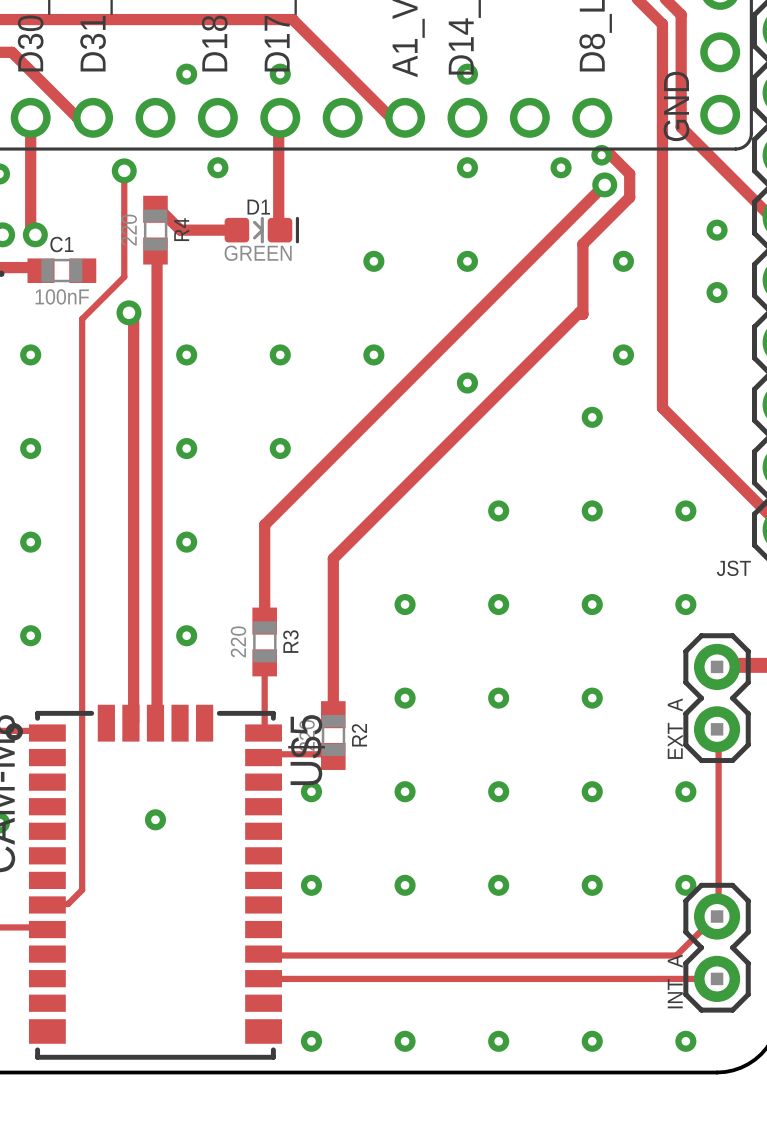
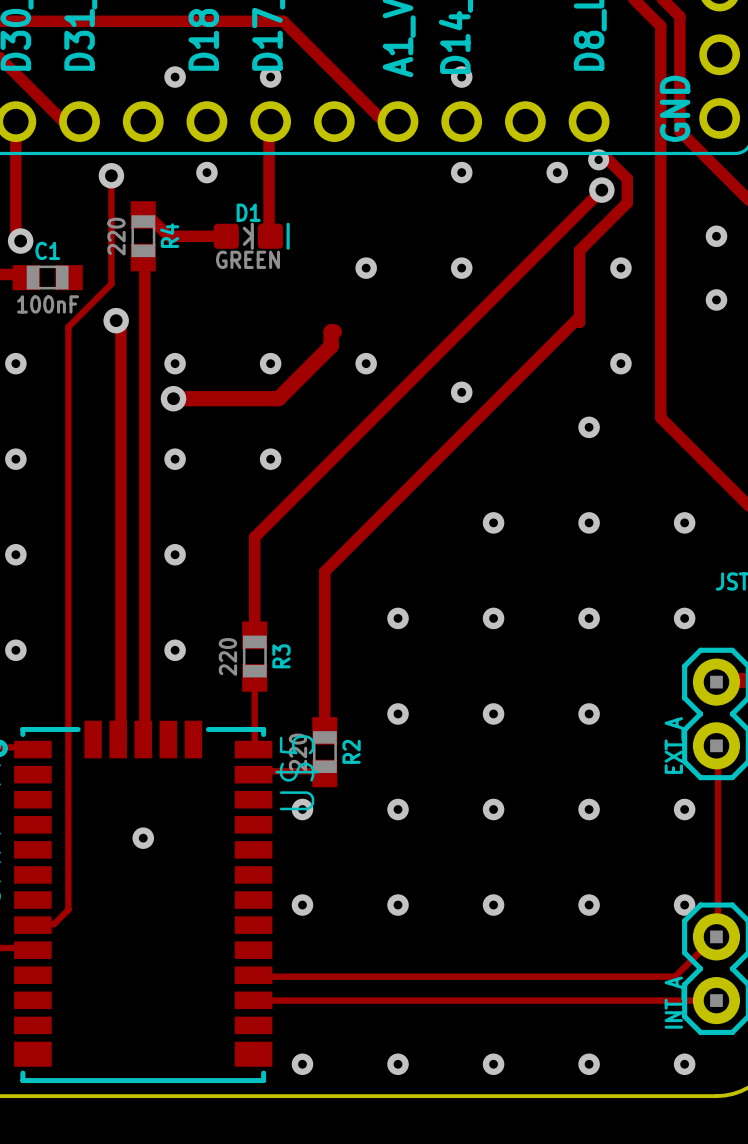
track: none -> (334, 331) (331, 331) (331, 346) (278, 398) (173, 398)
via: none -> (173, 398)

